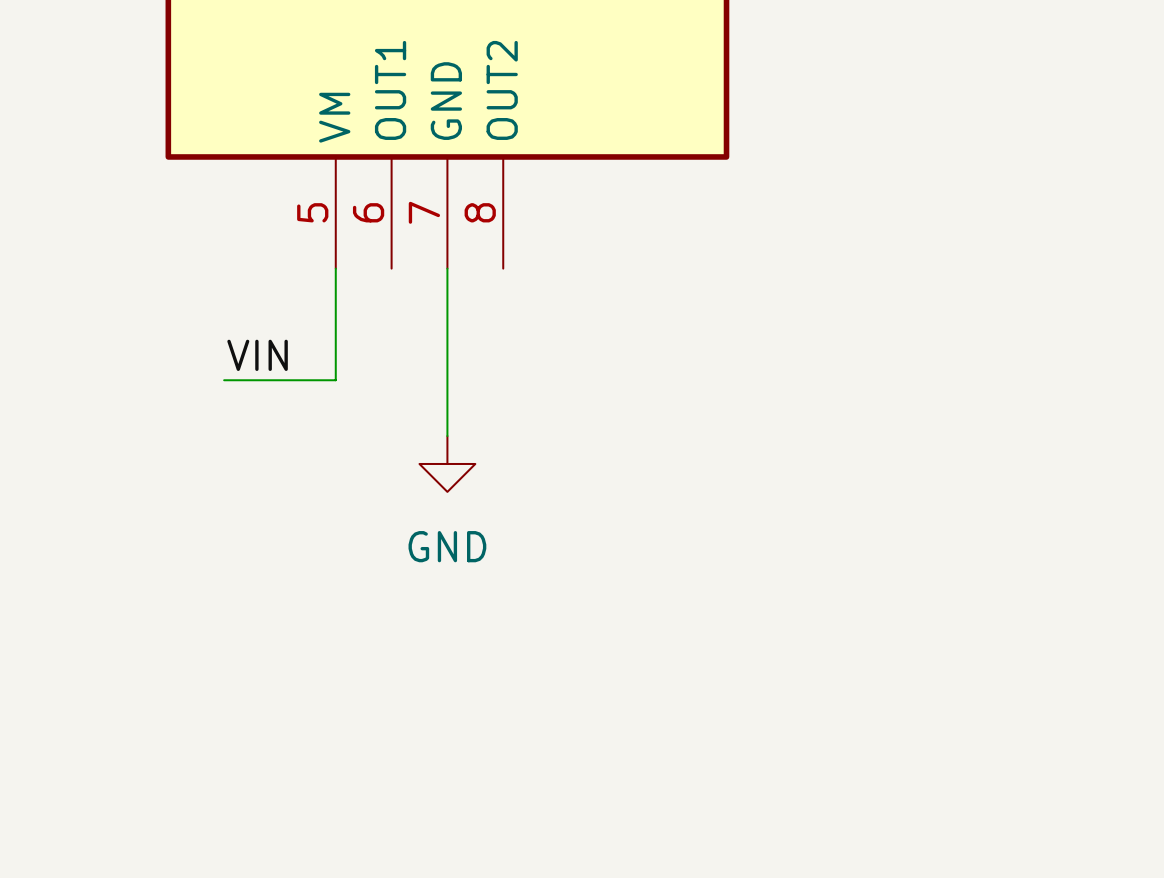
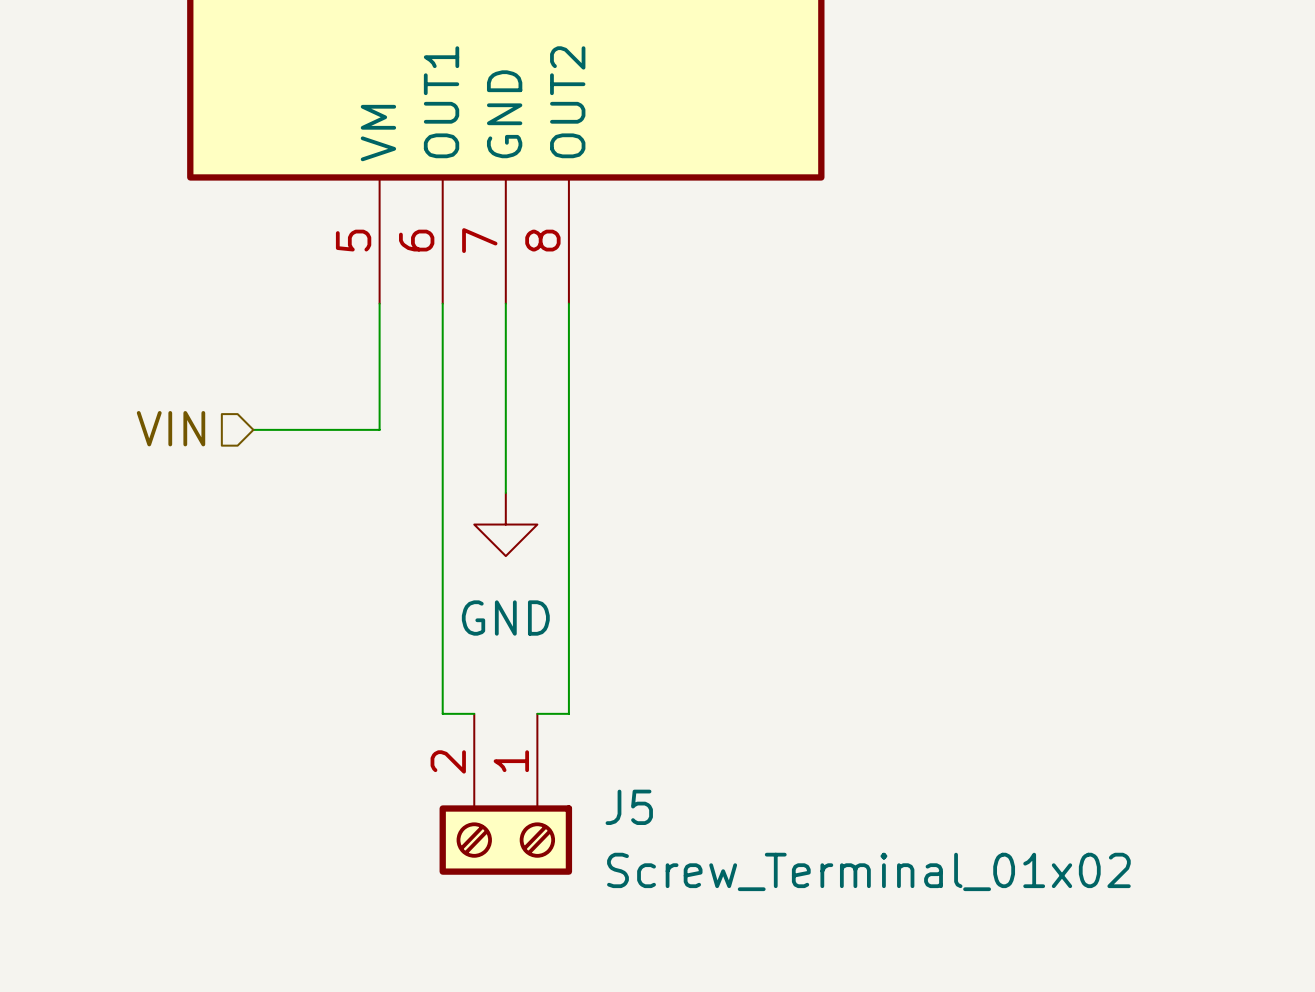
wire: none -> (442, 303) (442, 713) (474, 713)
wire: none -> (568, 303) (568, 713) (537, 713)
label: VIN (257, 355) -> none
hierarchical label: none -> VIN (171, 428)
J5: none -> Screw_Terminal_01x02 (505, 794)

